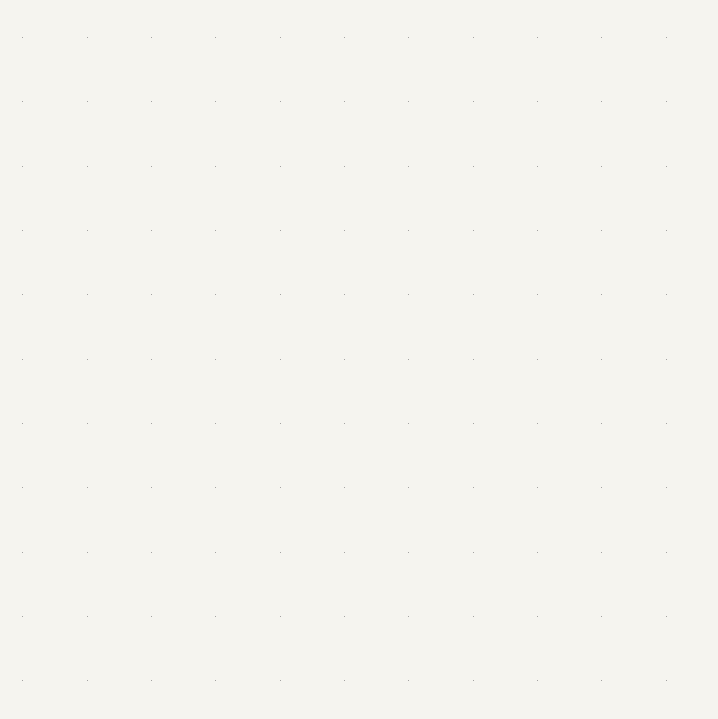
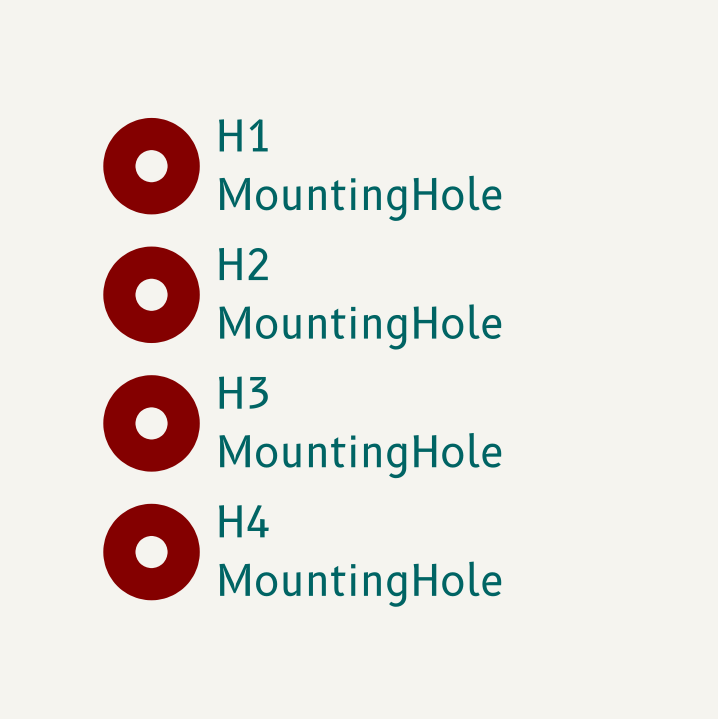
H1: none -> MountingHole (151, 166)
H2: none -> MountingHole (151, 294)
H3: none -> MountingHole (151, 423)
H4: none -> MountingHole (151, 552)

